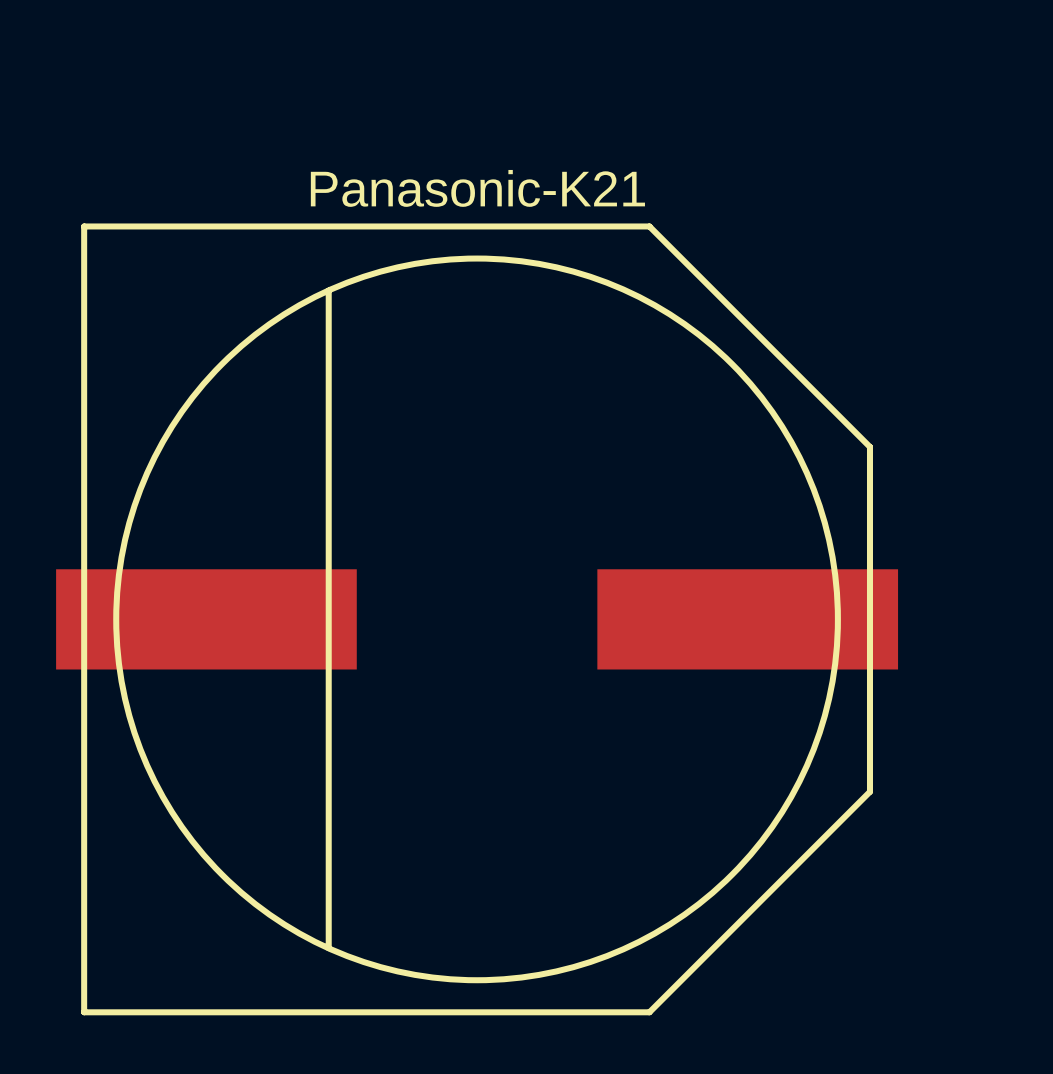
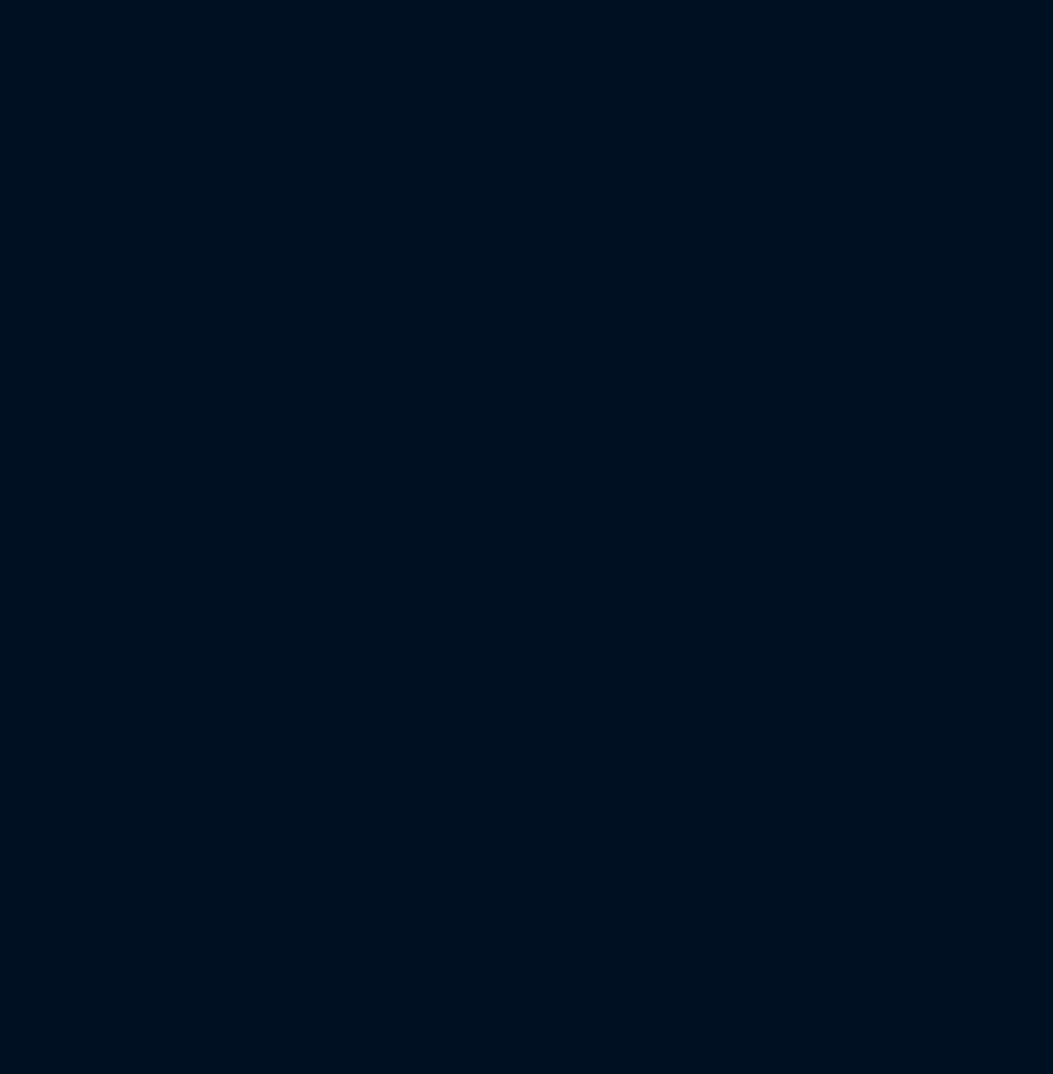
Panasonic-K21: (477, 619) -> none

